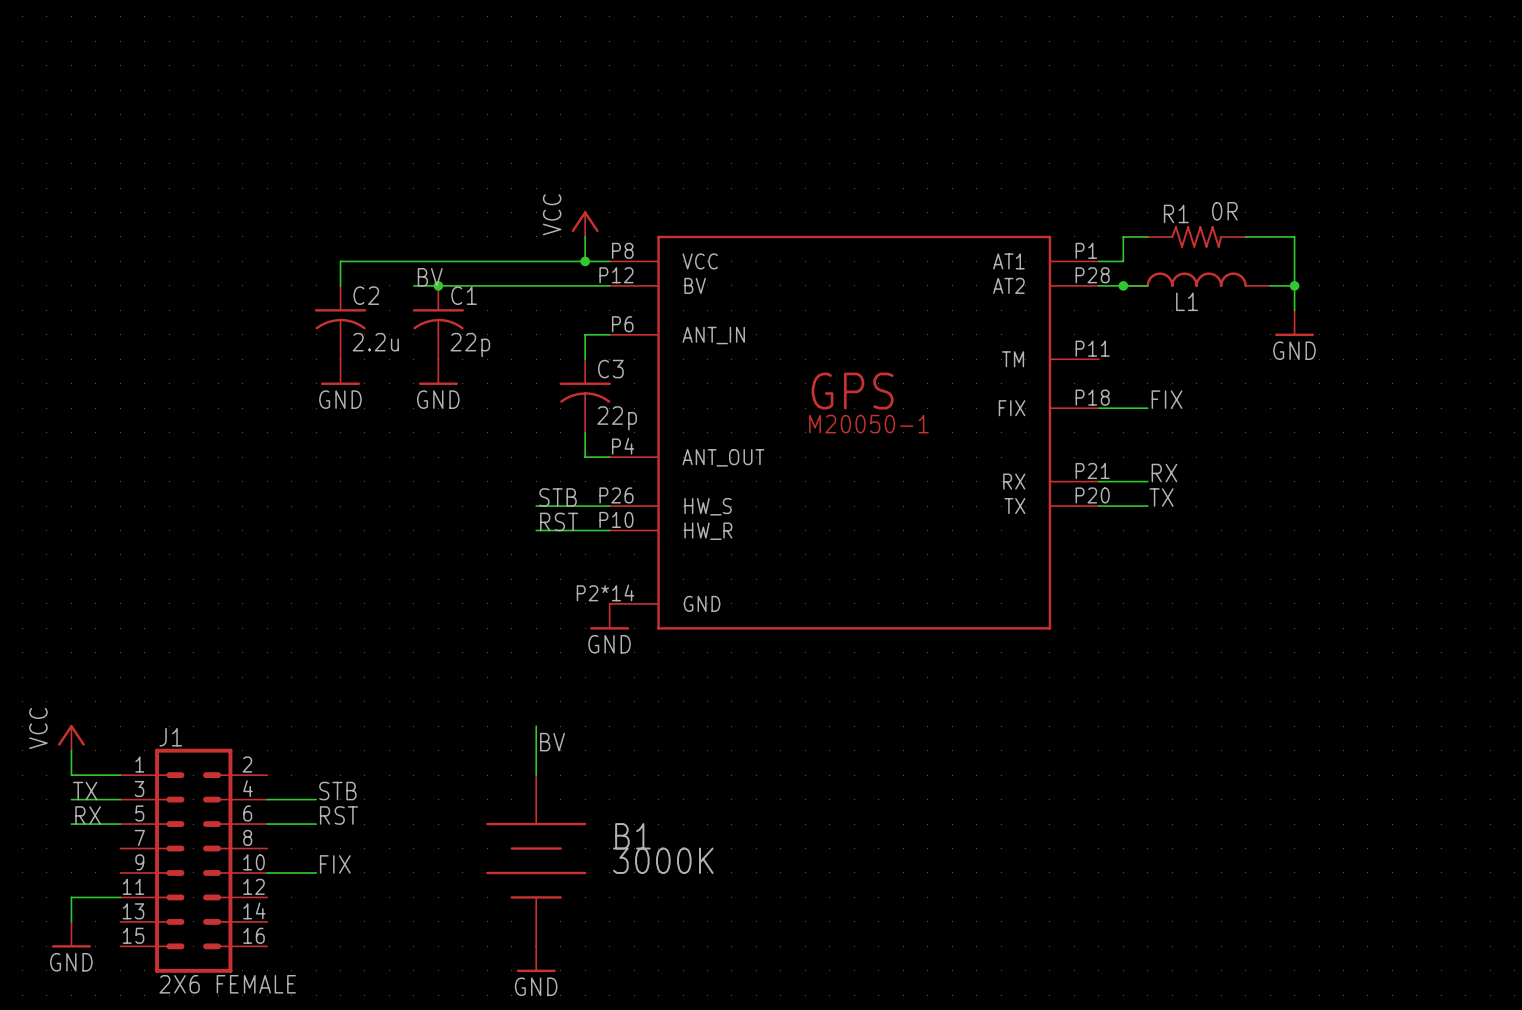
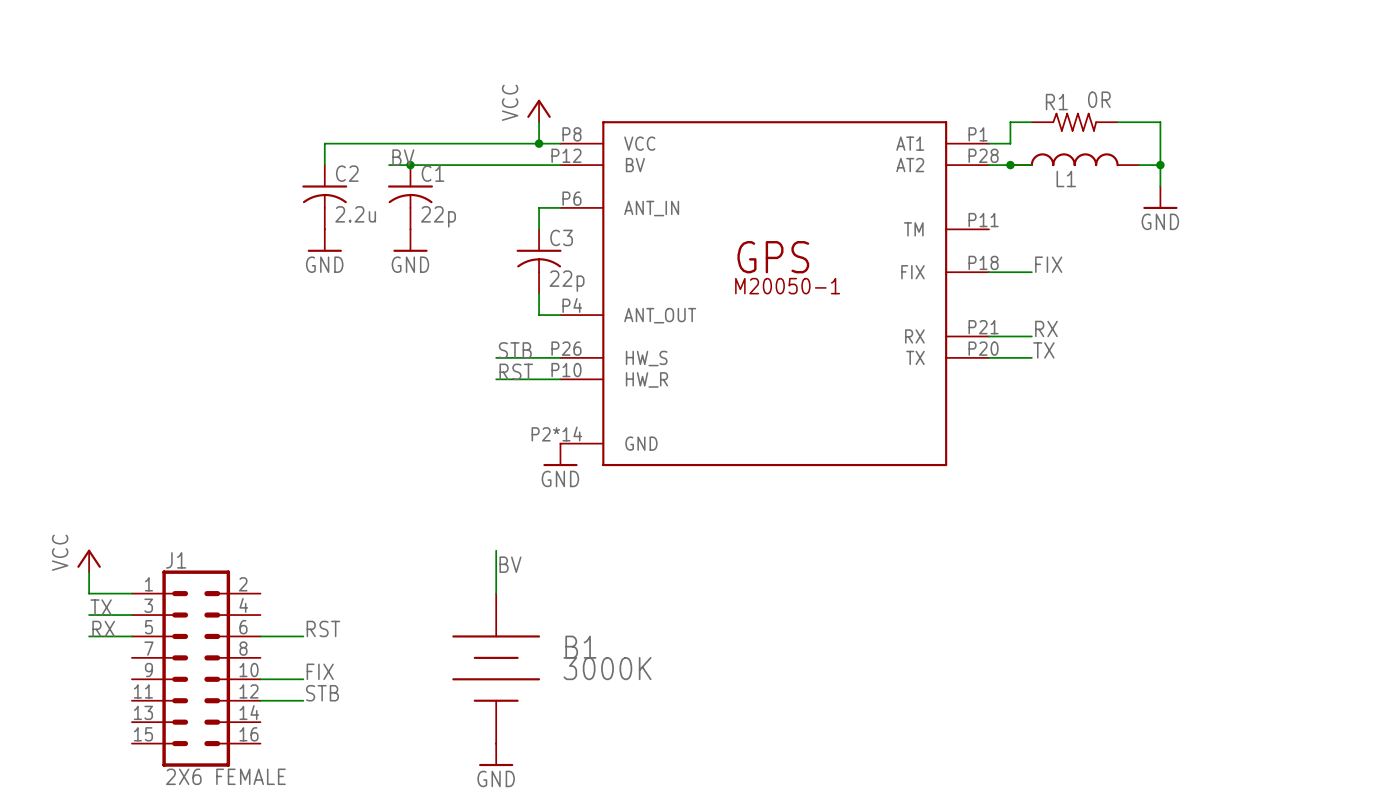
label position: STB (337, 791) -> STB (322, 693)
wire: (267, 799) (316, 799) -> (260, 700) (303, 700)
wire: (120, 897) (71, 897) (71, 921) -> none
power symbol: GND (71, 934) -> none

